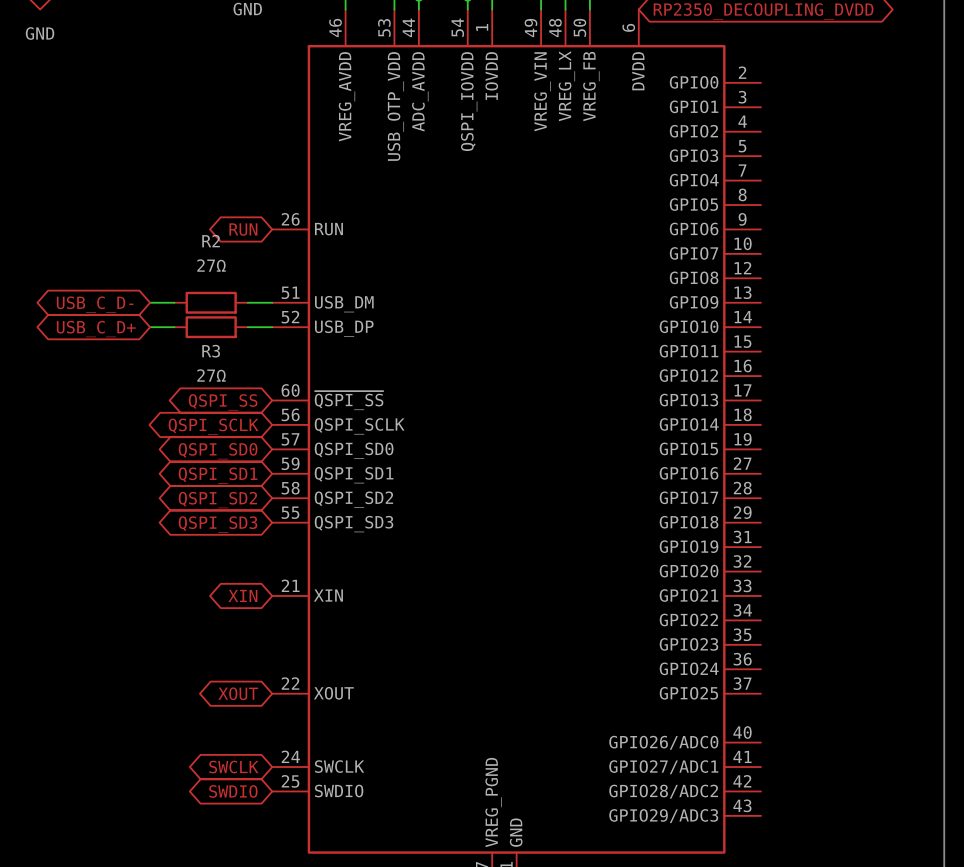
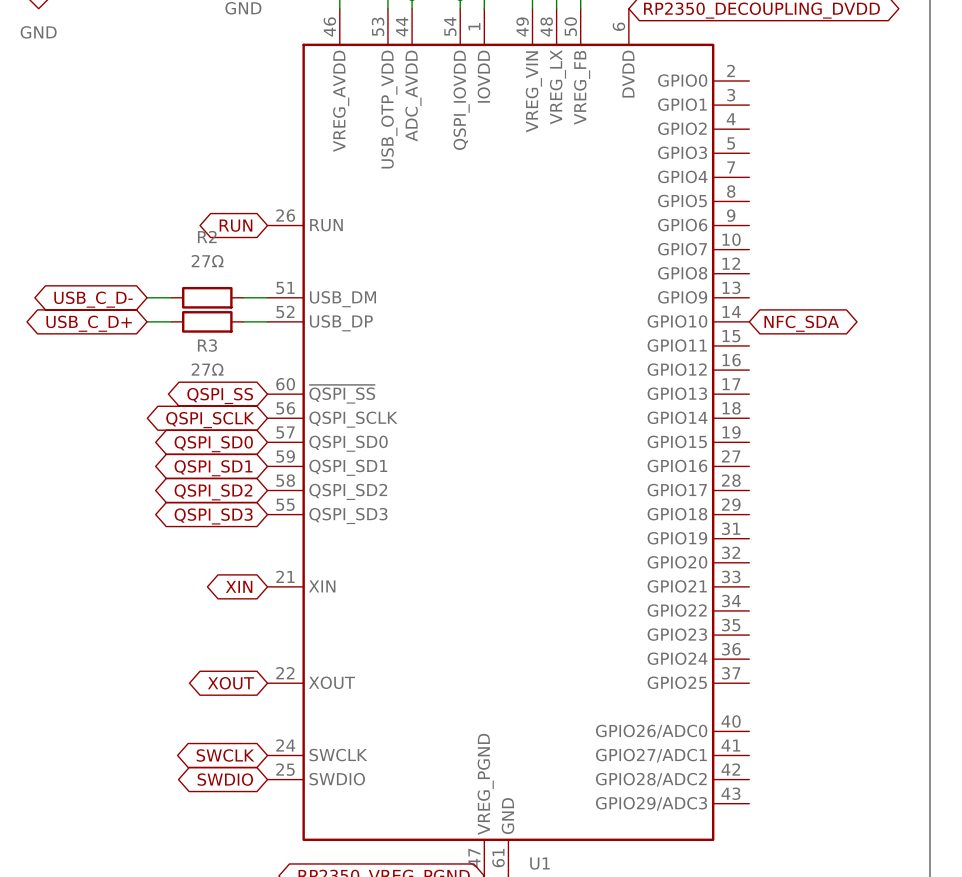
global label: none -> NFC_SDA (801, 323)

